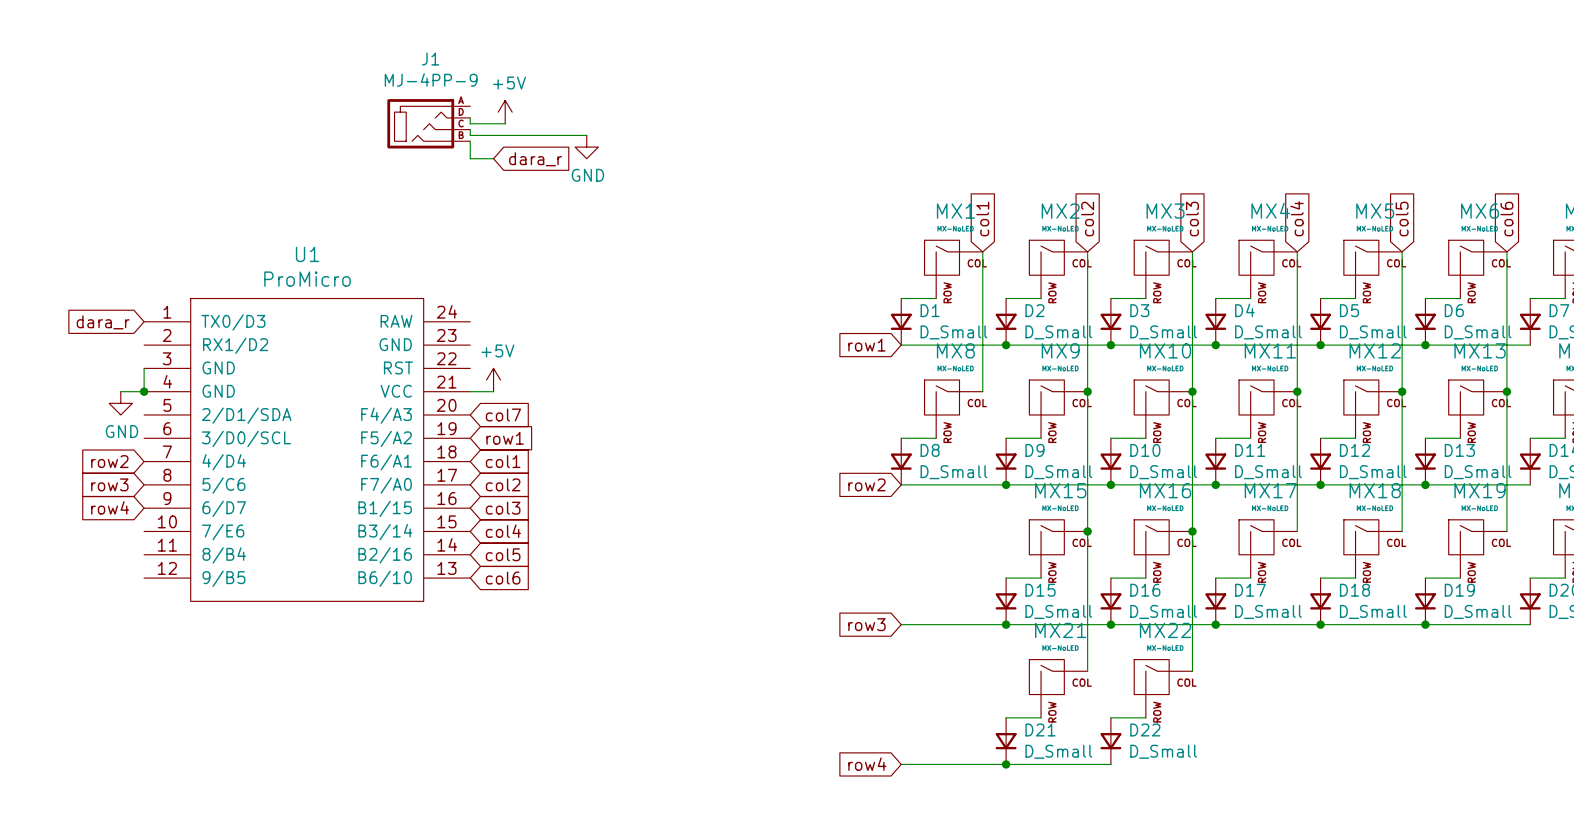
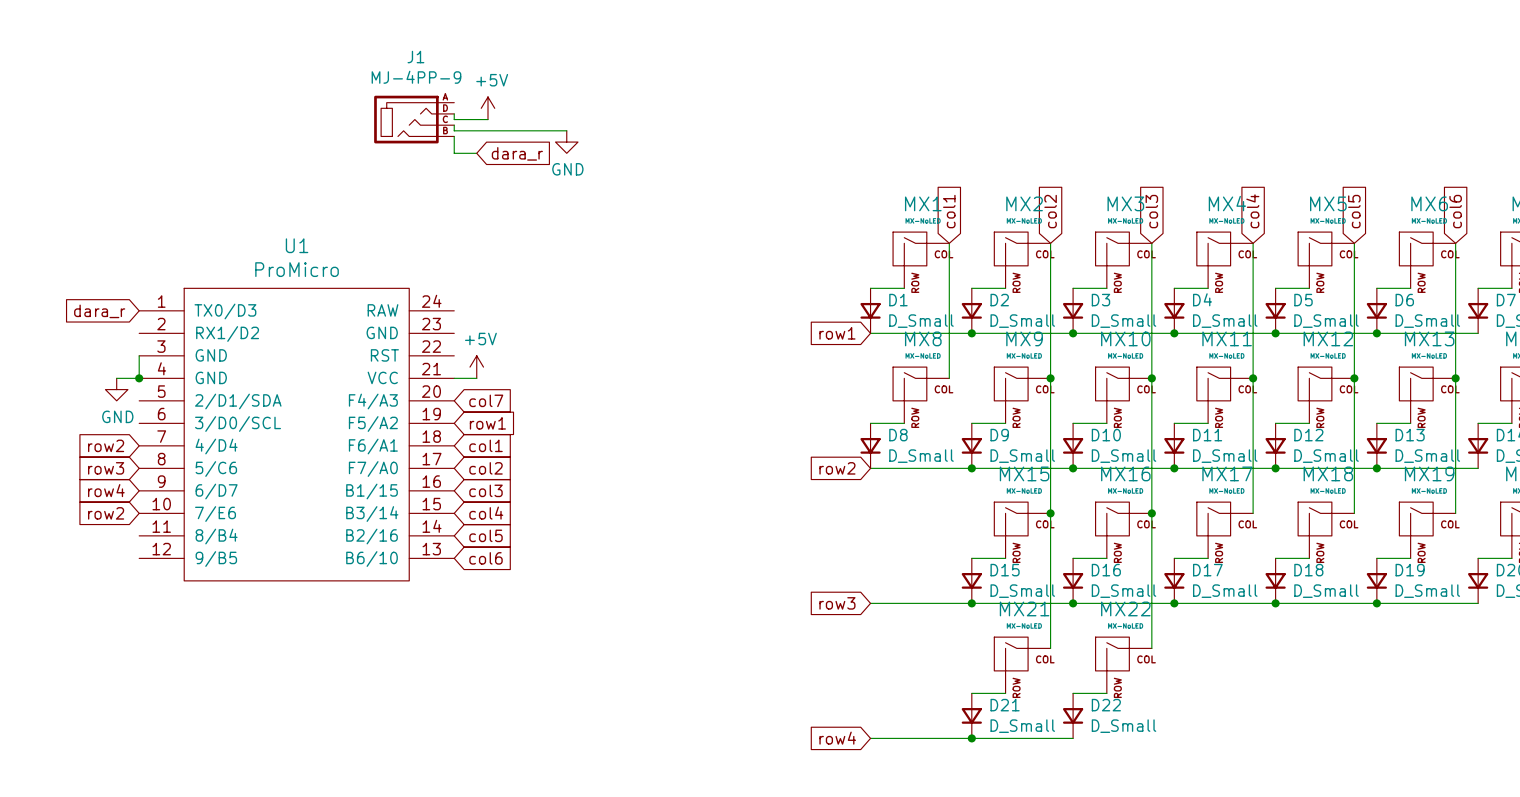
global label: none -> row2 (106, 513)

